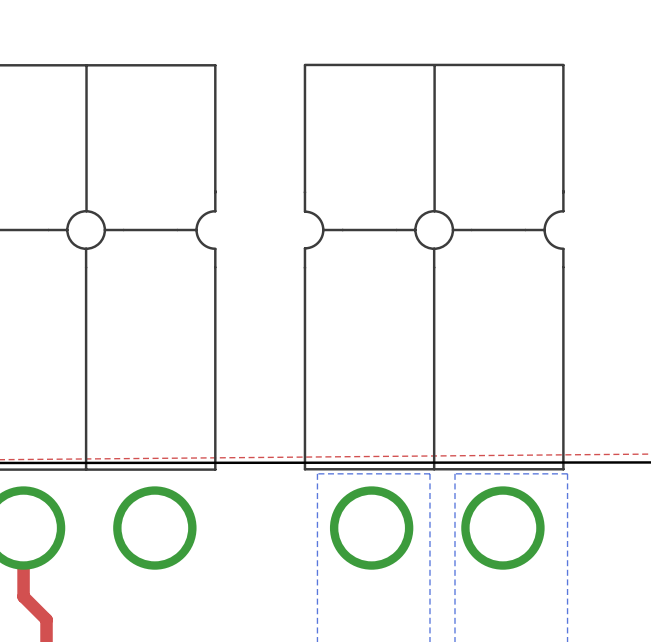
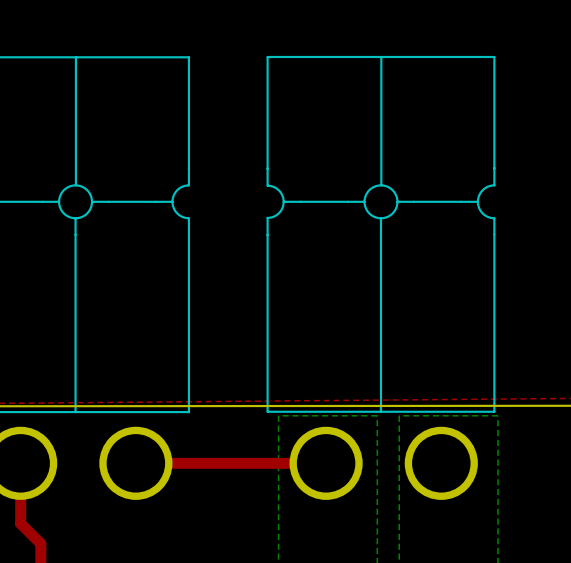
top track: none -> (135, 463) (326, 463)

